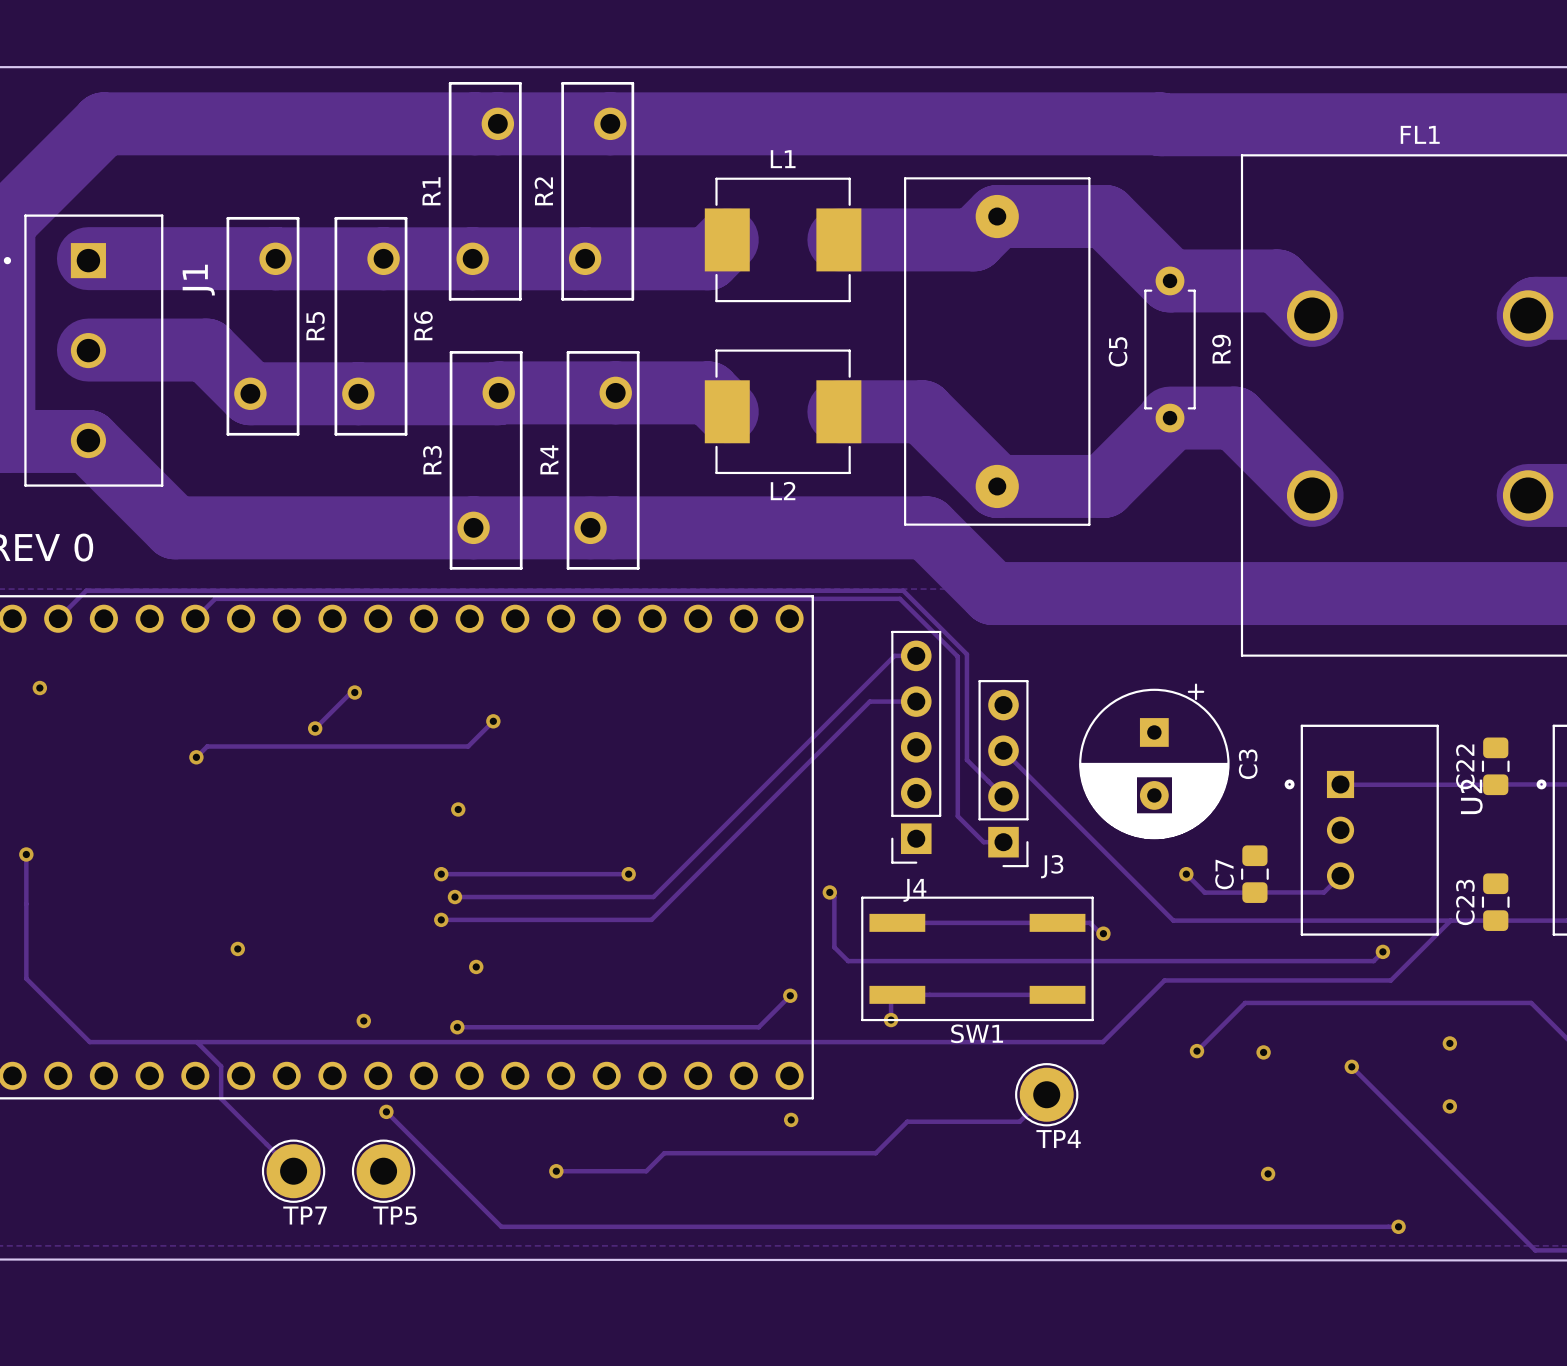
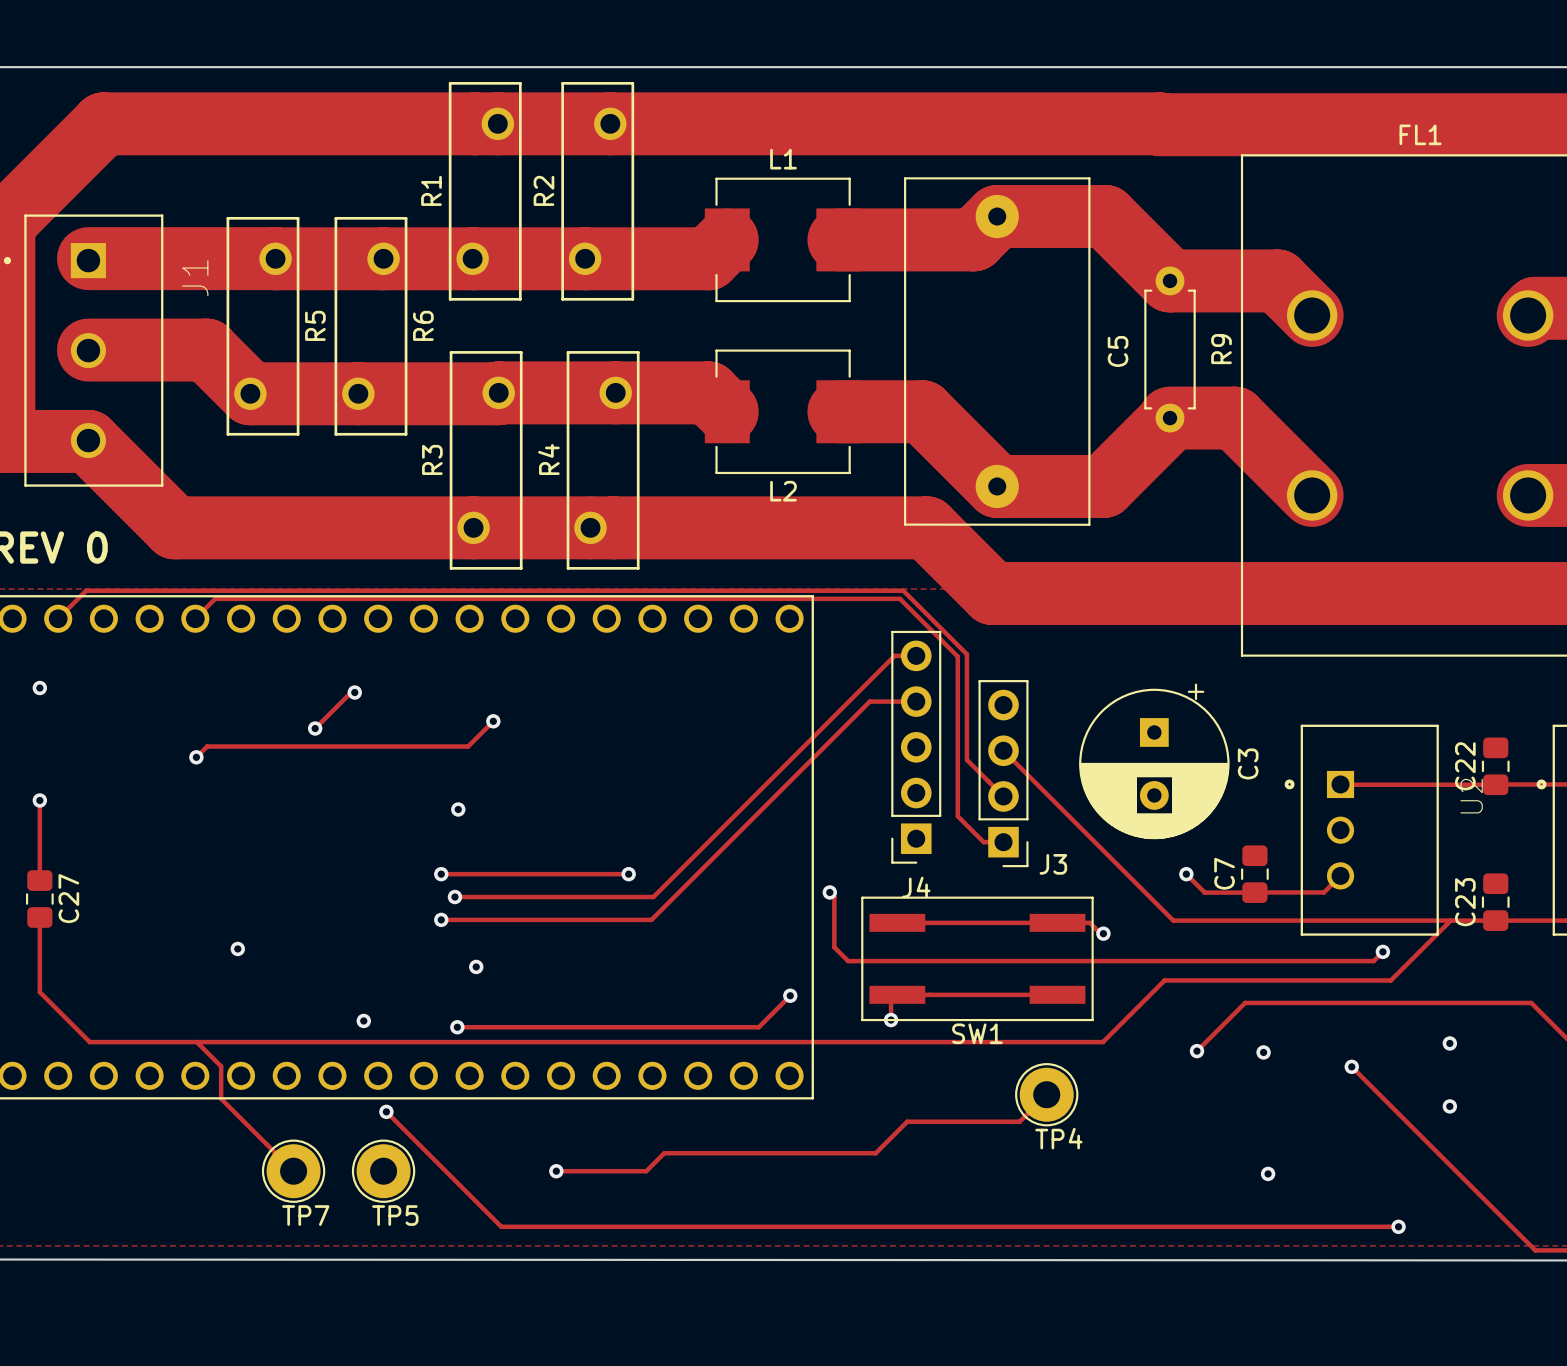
track: none -> (39, 800) (39, 880)
track: (26, 854) (26, 978) (39, 992) -> (39, 917) (39, 992)
via position: (26, 854) -> (39, 800)
C27: none -> (39, 899)
via: (791, 1119) -> none

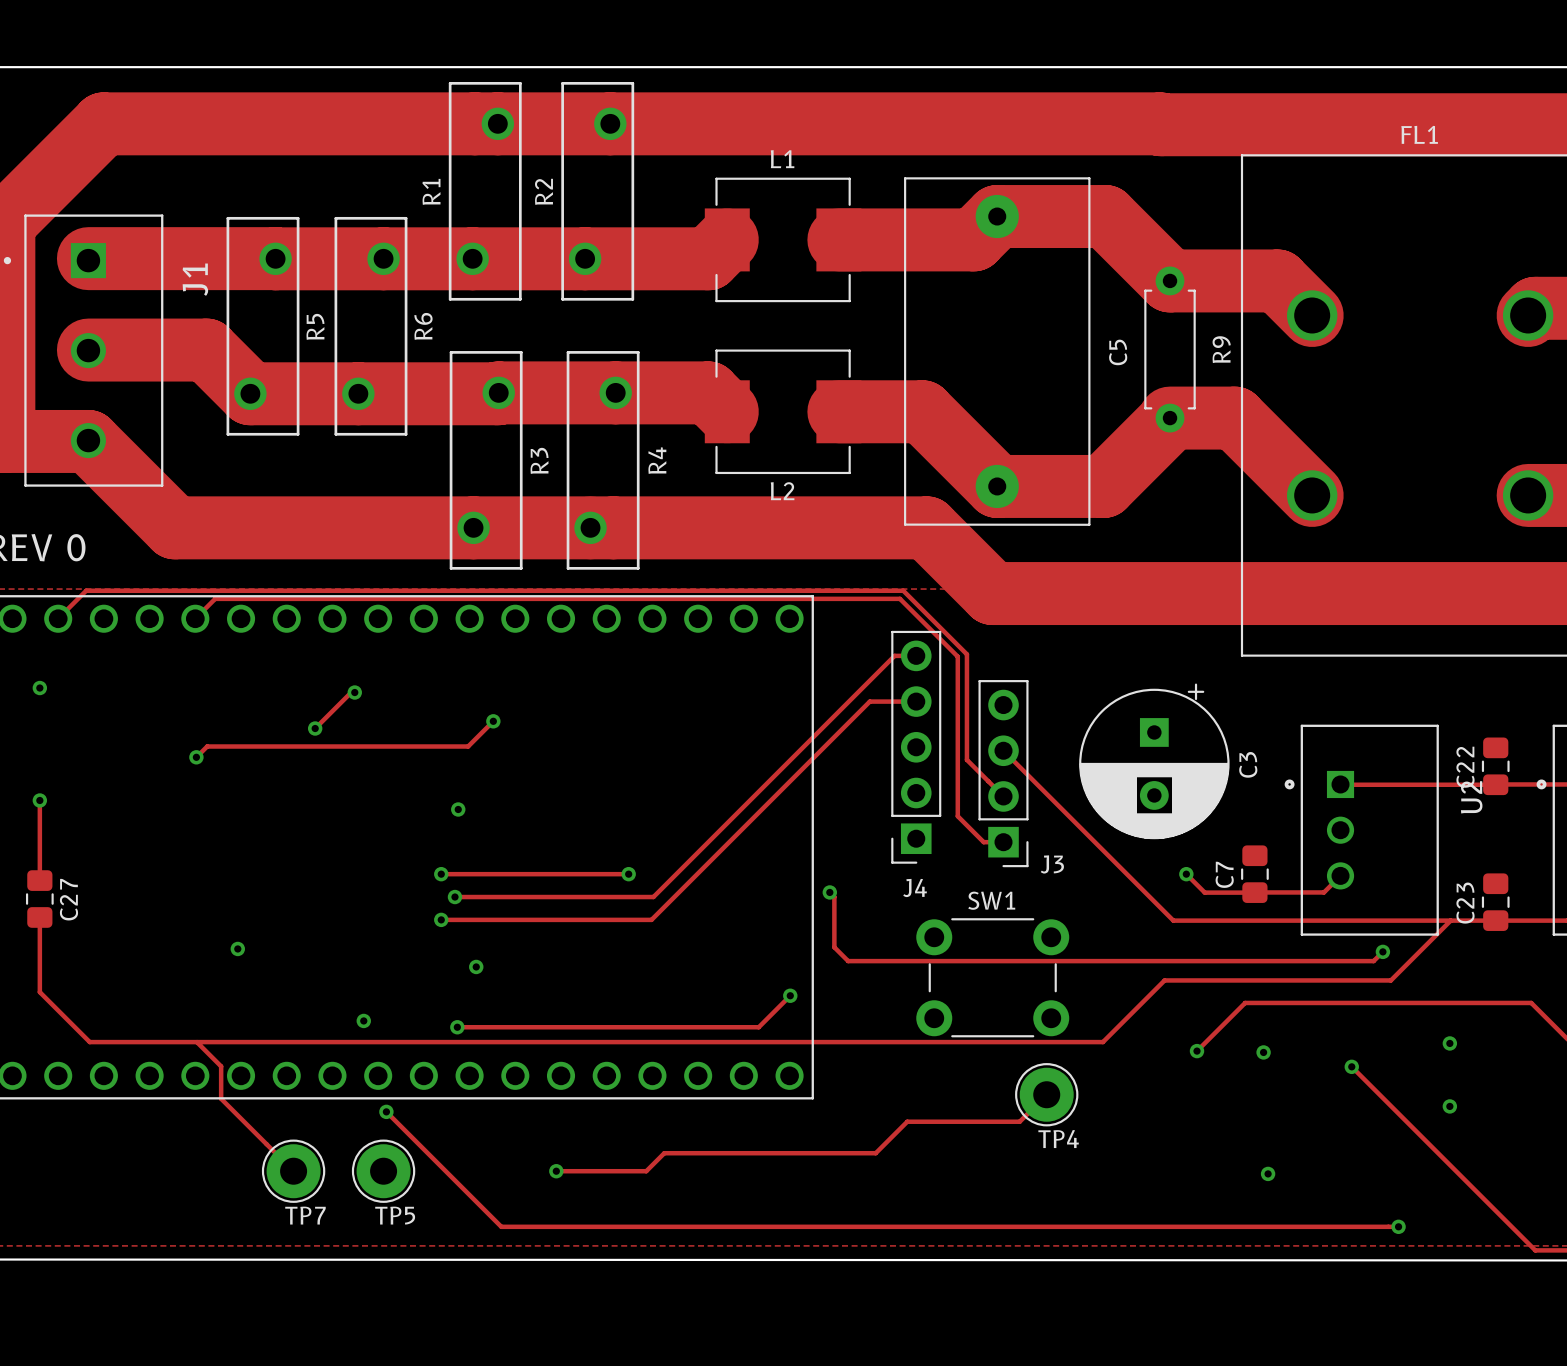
R3 name position: R3 (432, 459) -> R3 (539, 460)
R4 name position: R4 (548, 459) -> R4 (657, 460)
SW1 footprint: [861, 896, 1094, 1022] -> [916, 918, 1070, 1038]
track: (897, 922) (1089, 922) (1100, 933) (1103, 933) -> none
via: (1103, 933) -> none
track: (1057, 994) (897, 994) (891, 1001) (891, 1020) -> none
via: (891, 1020) -> none
SW1 name position: SW1 (977, 1033) -> SW1 (991, 900)

